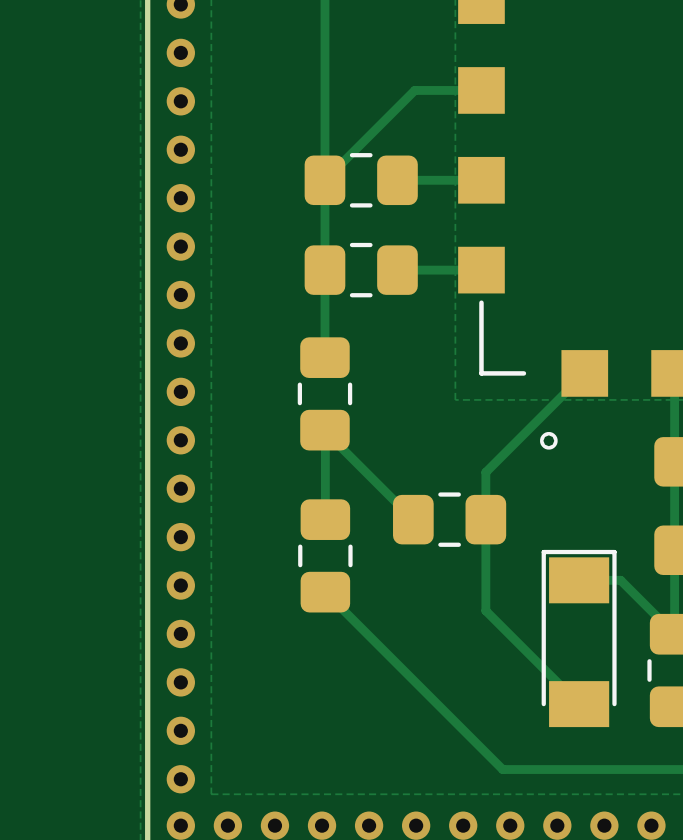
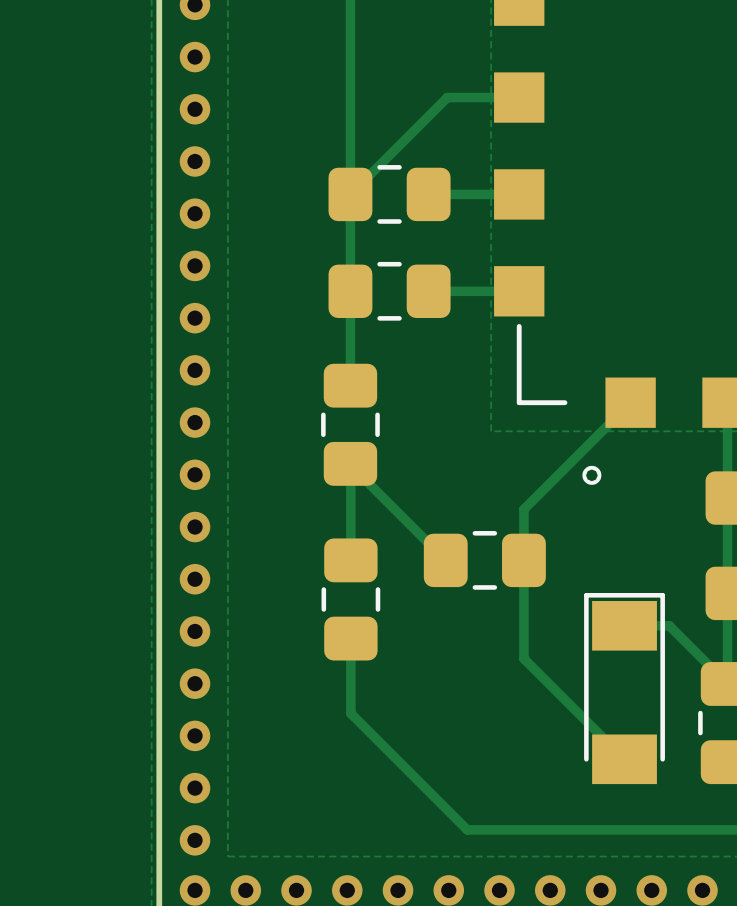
track: (325, 592) (502, 769) -> (350, 638) (350, 713) (467, 829) (542, 829)

